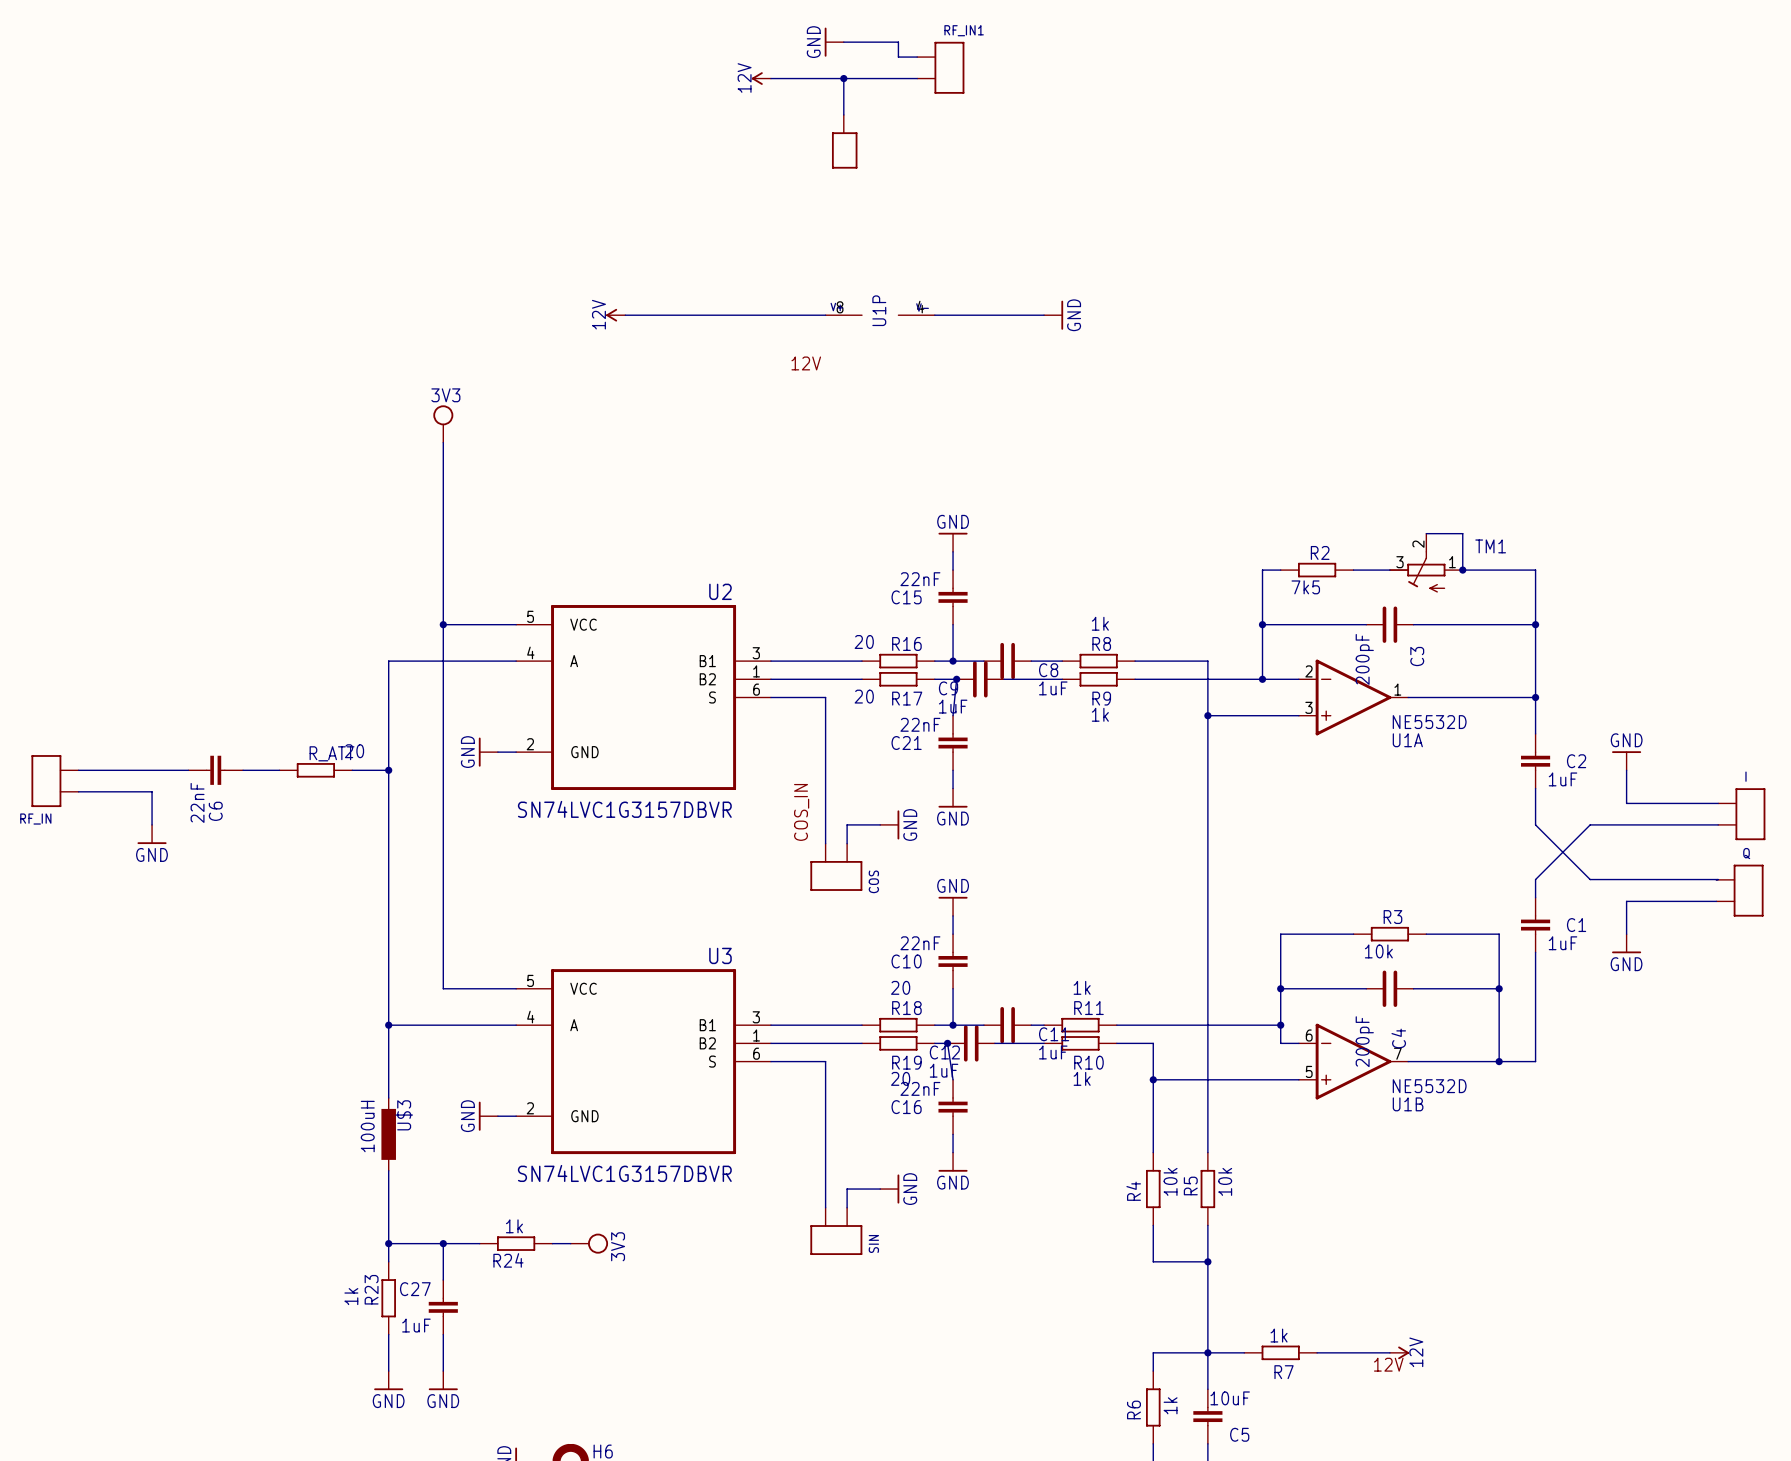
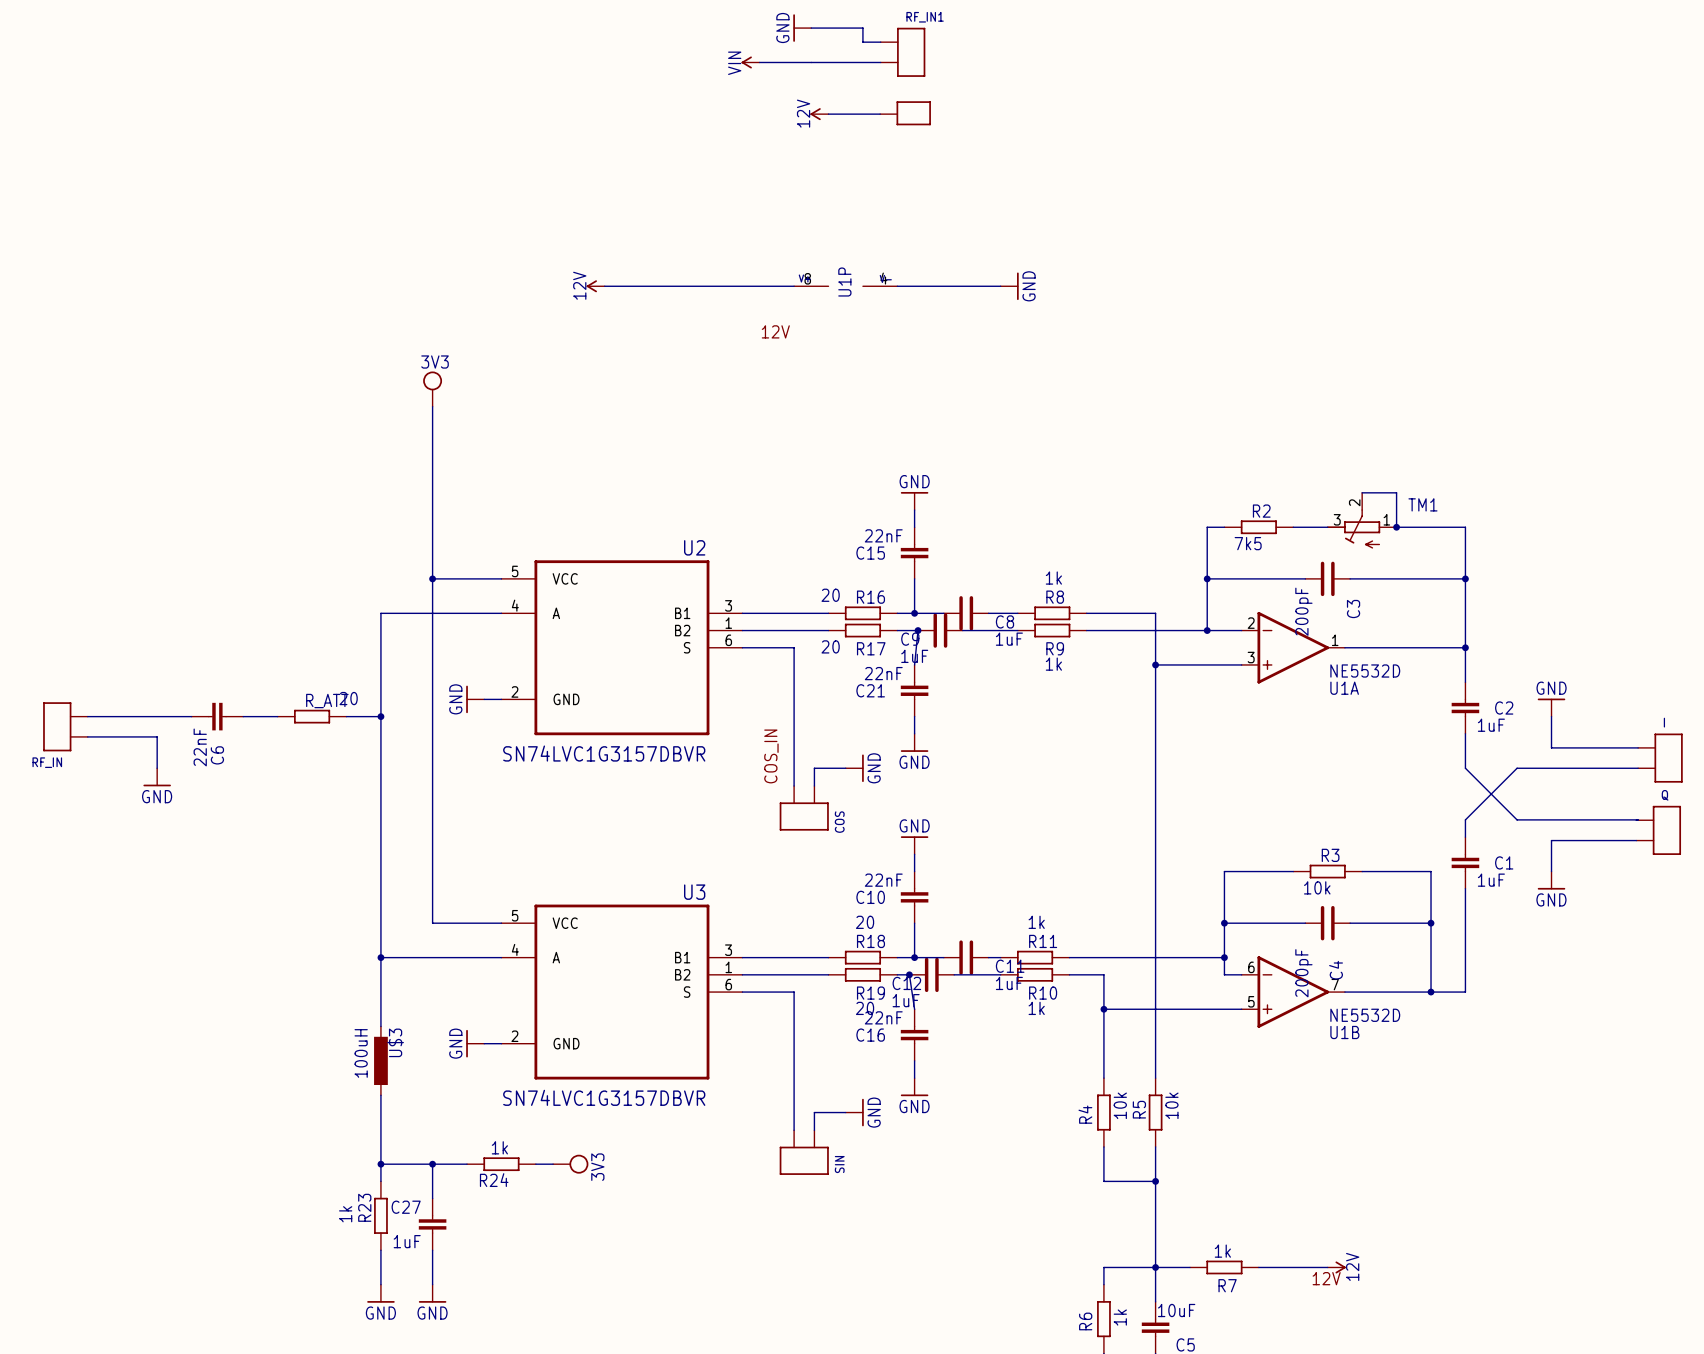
power symbol position: 12V (761, 78) -> 12V (819, 114)
power symbol: none -> VIN (750, 62)
wire: (843, 78) (843, 114) -> none
junction: (843, 78) -> none
wire: none -> (828, 114) (880, 114)
part position: (844, 141) -> (905, 113)
part rotation: 0° (844, 150) -> 90° counterclockwise (913, 113)

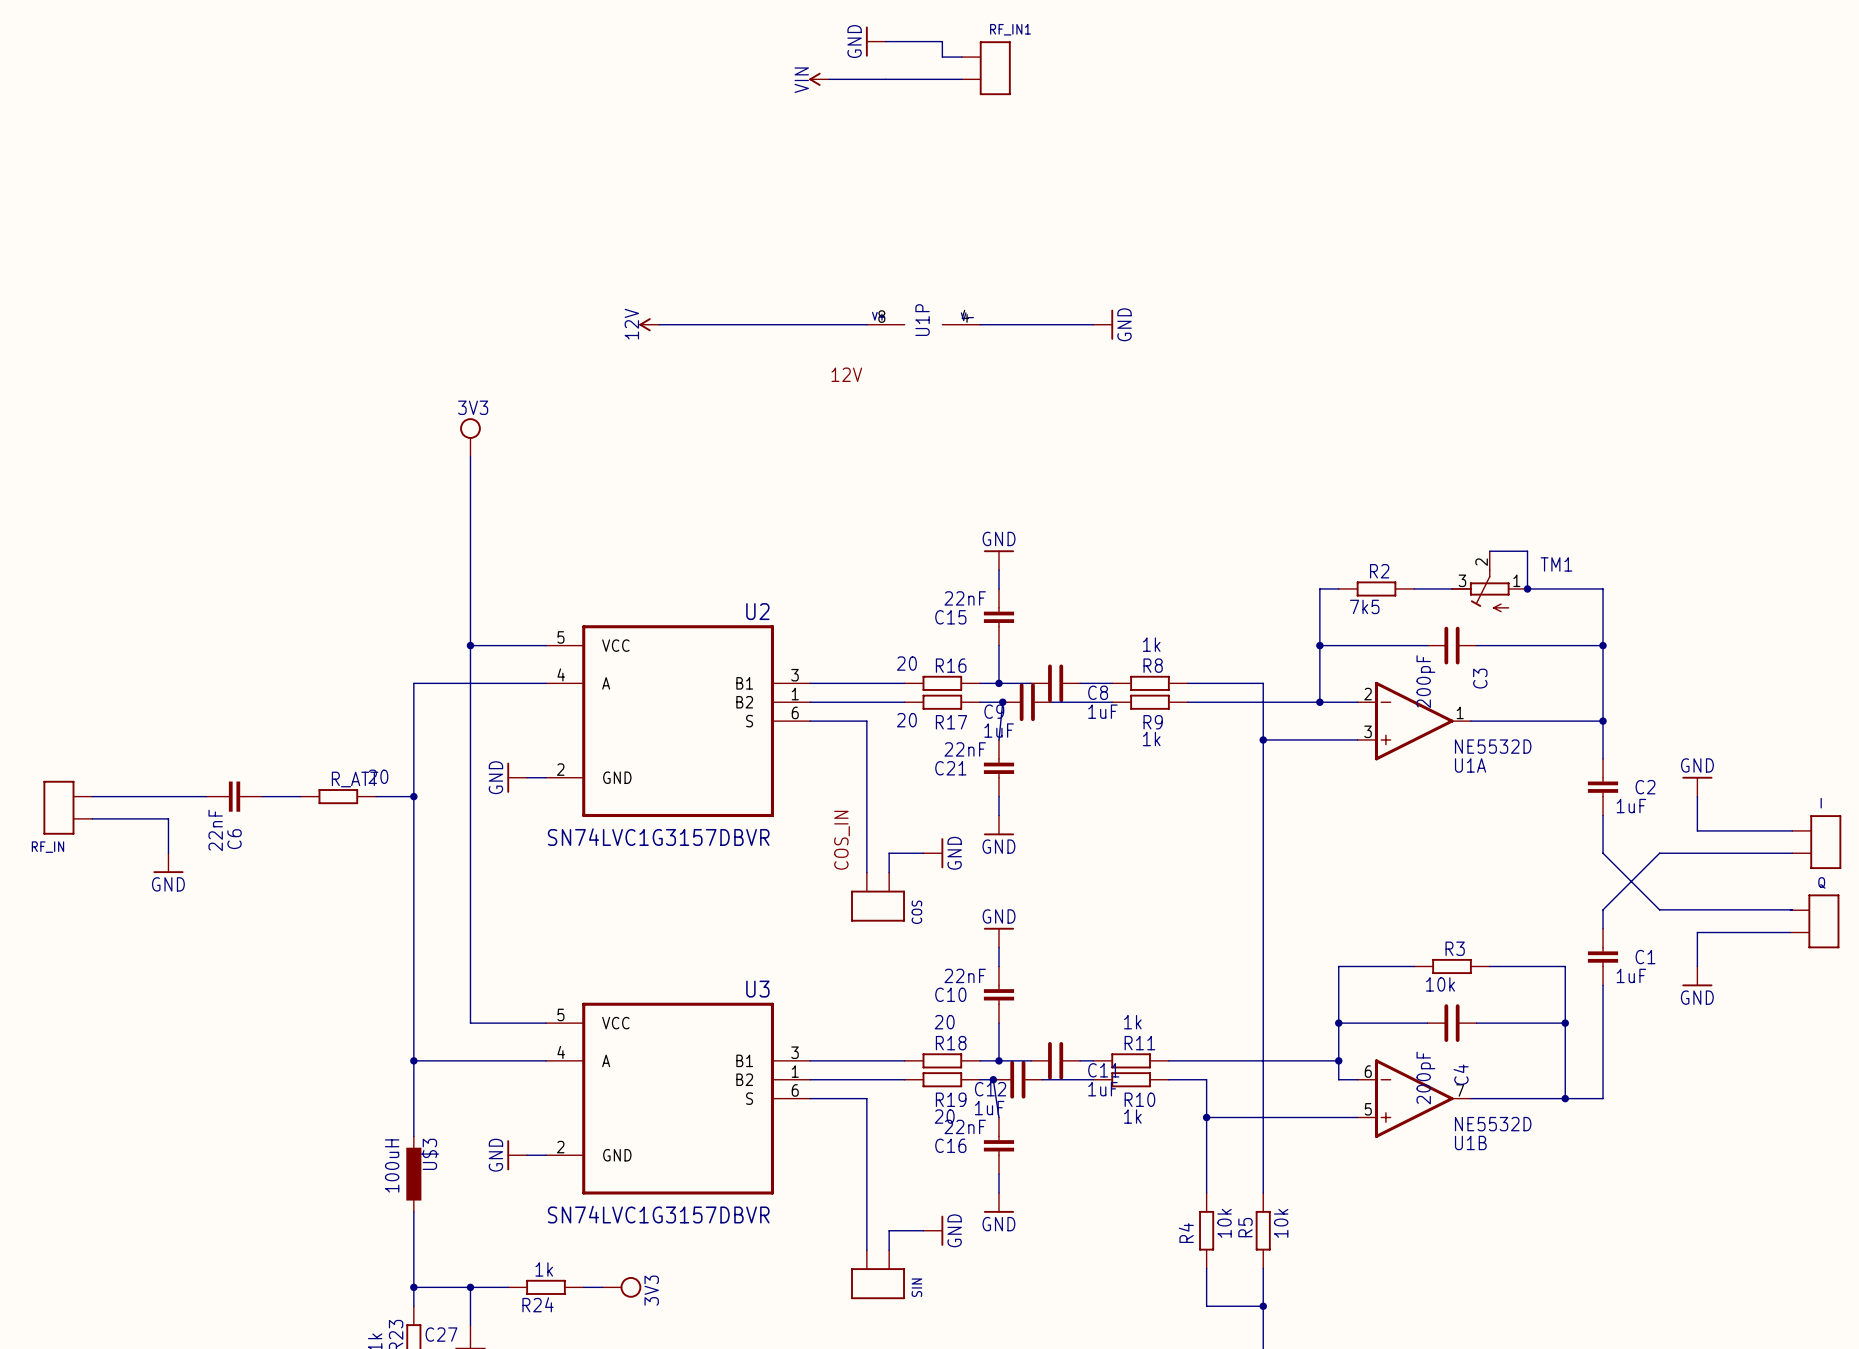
part: (905, 113) -> none
power symbol: 12V (819, 114) -> none
wire: (828, 114) (880, 114) -> none

